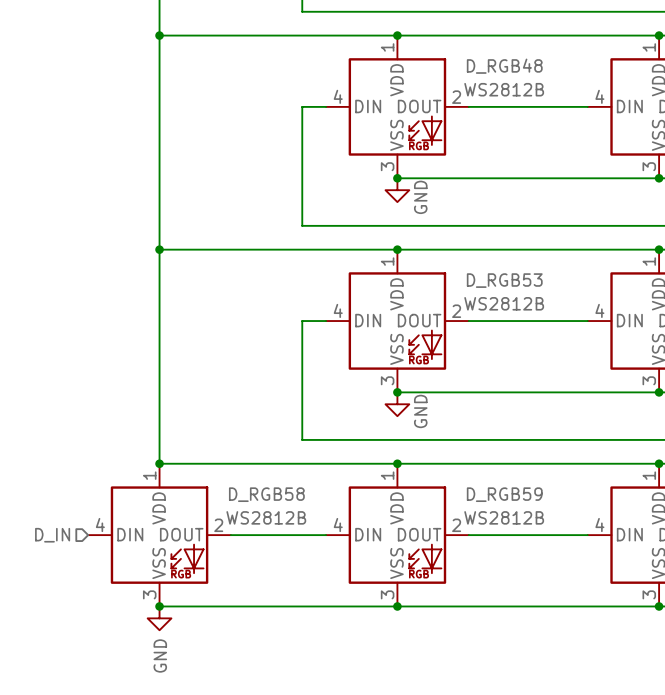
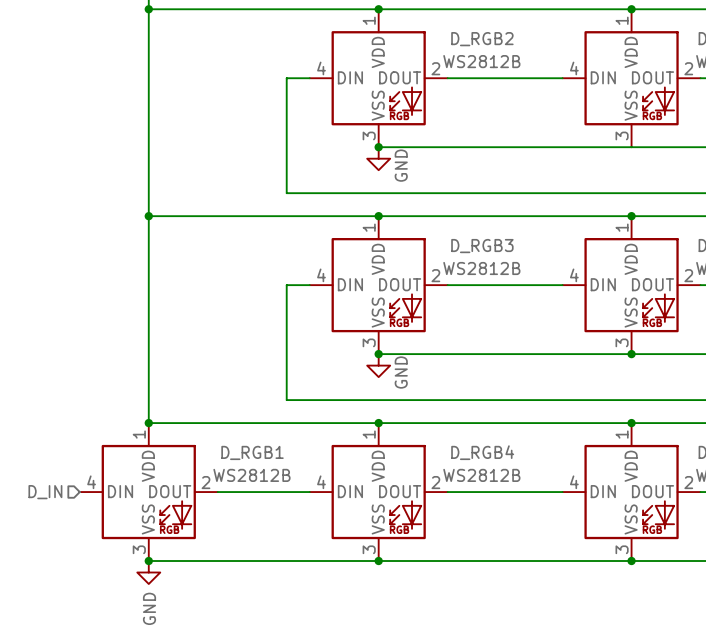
D_RGB48 name: D_RGB48 (504, 66) -> D_RGB2 (482, 39)
junction: (659, 178) -> none
D_RGB53 name: D_RGB53 (504, 280) -> D_RGB3 (482, 246)
D_RGB58 name: D_RGB58 (266, 494) -> D_RGB1 (252, 452)
D_RGB59 name: D_RGB59 (504, 494) -> D_RGB4 (482, 452)

